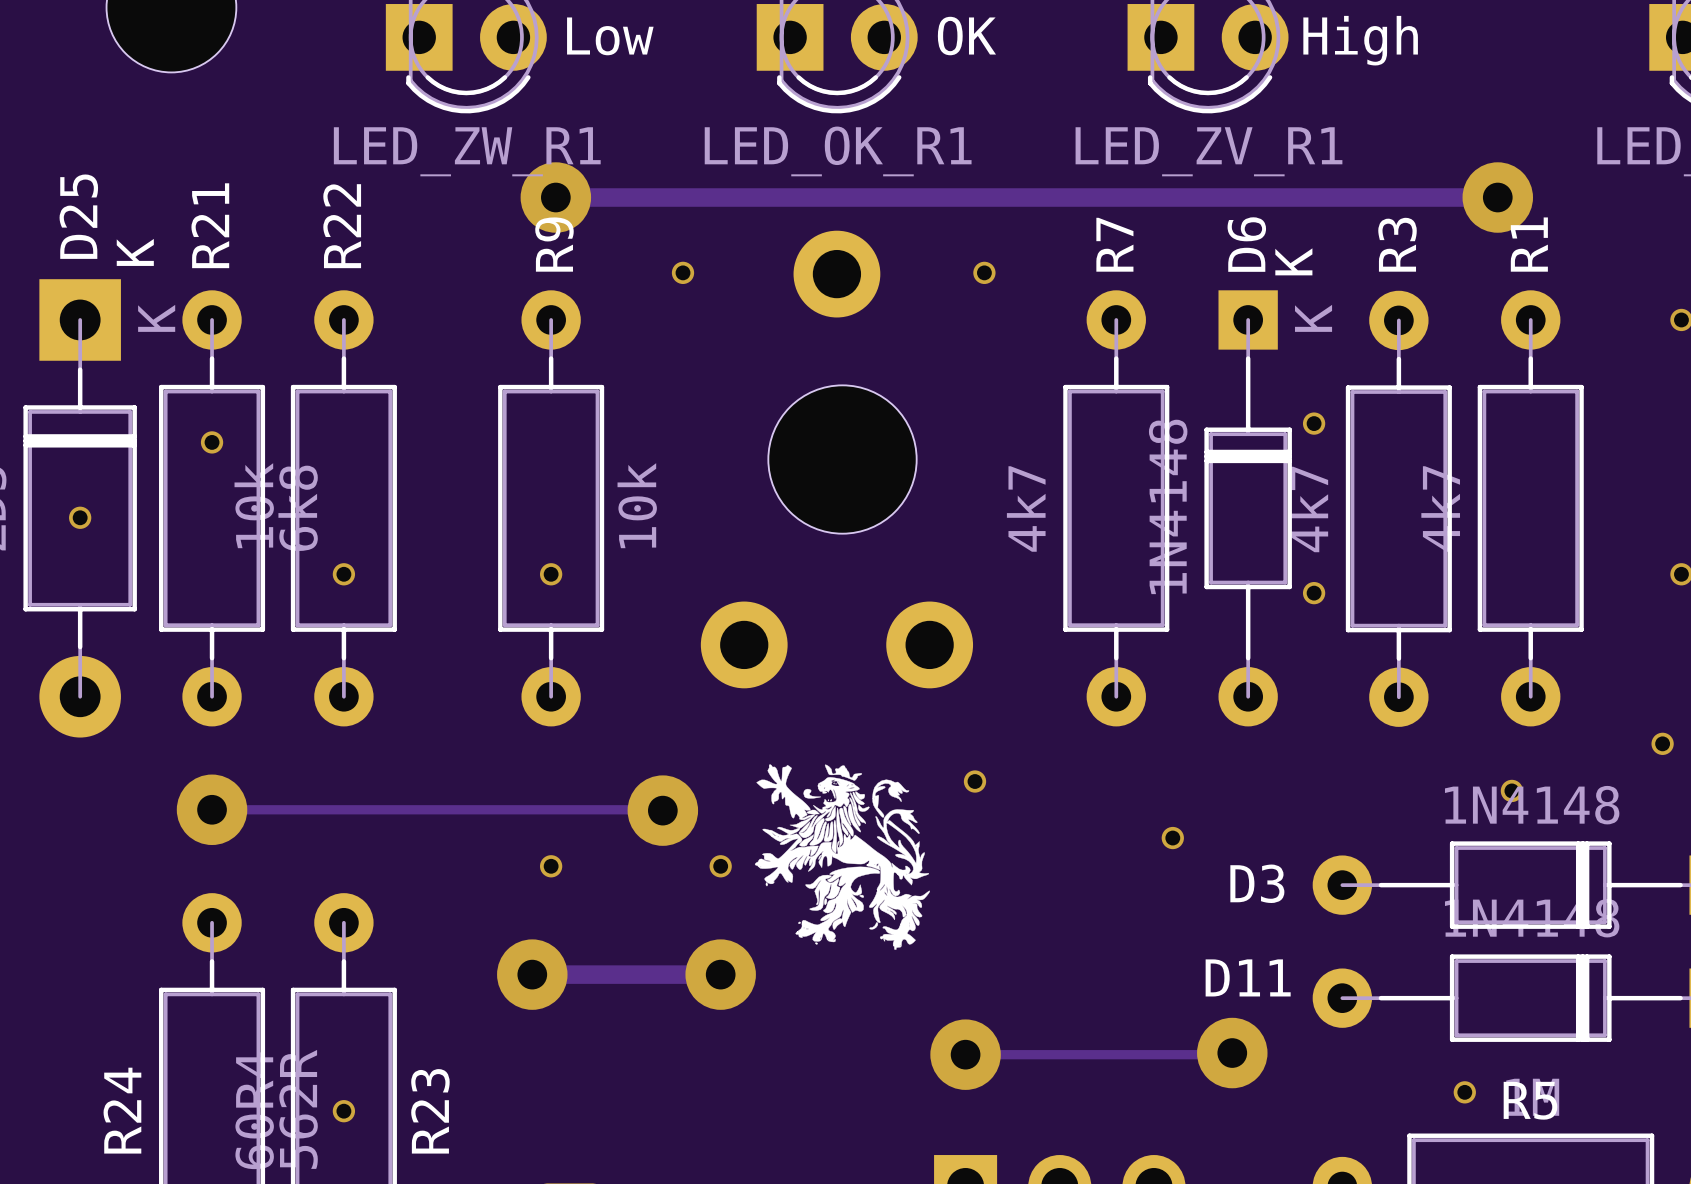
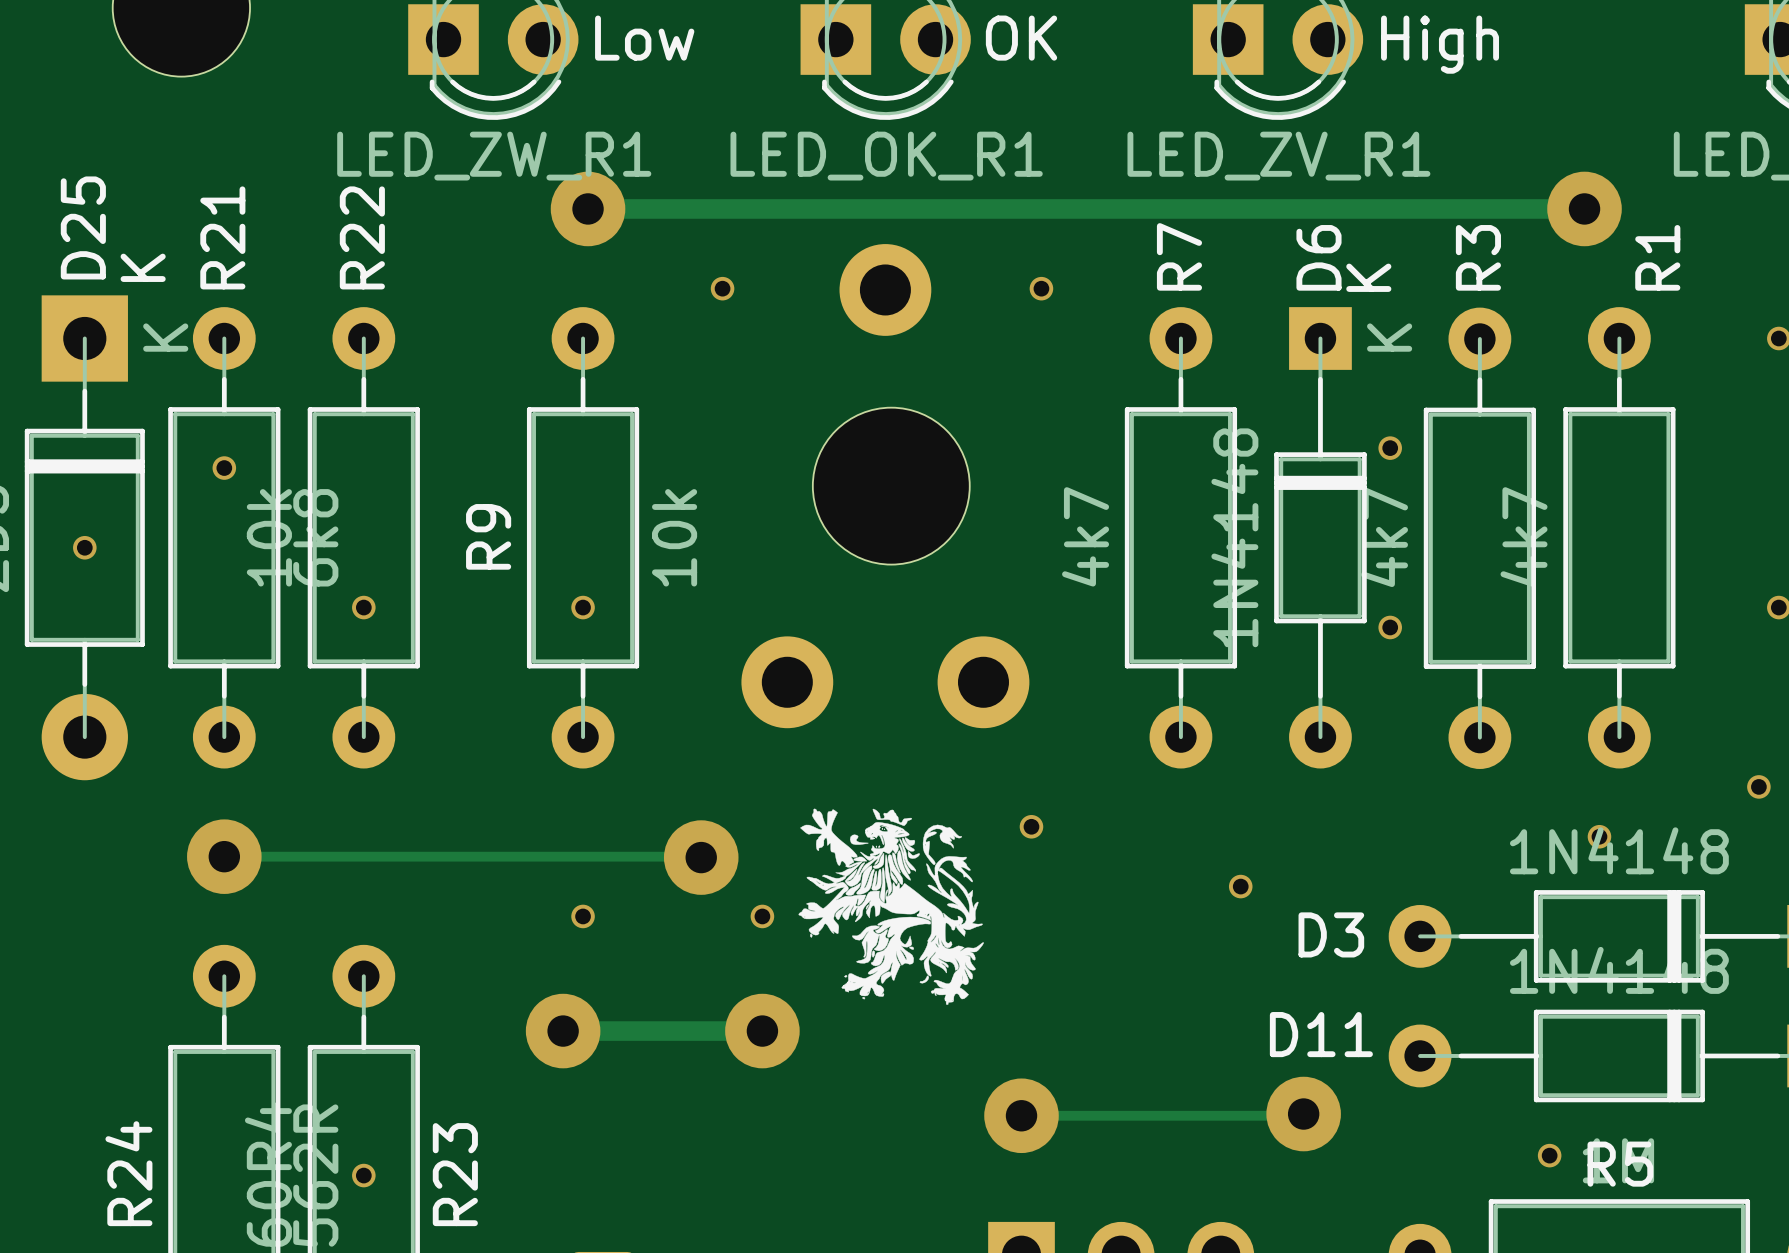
R9 name position: R9 (554, 244) -> R9 (488, 536)
R1 name position: R1 (1529, 244) -> R1 (1657, 257)

